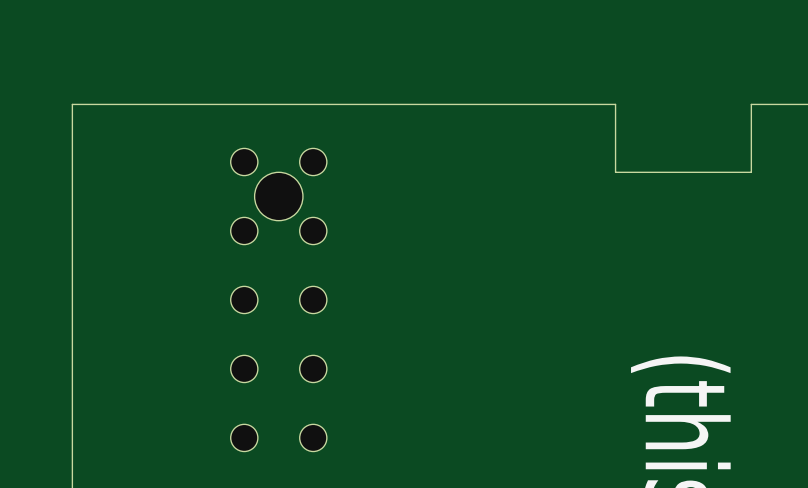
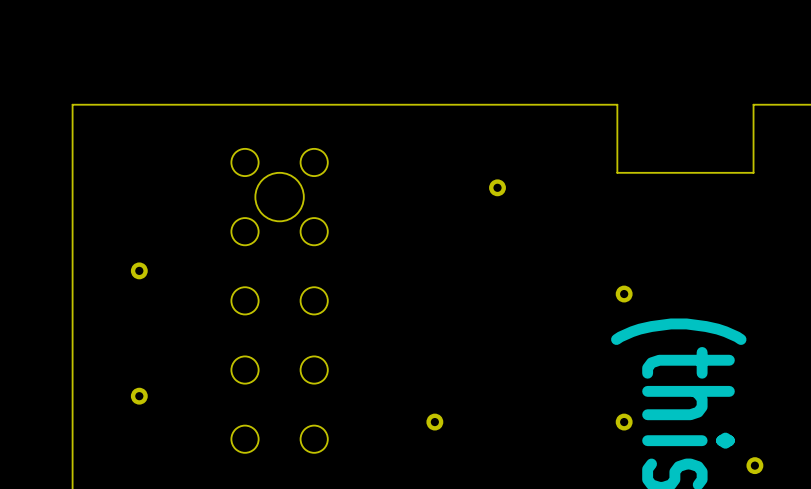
part: none -> (497, 187)
part: none -> (139, 270)
part: none -> (624, 294)
part: none -> (139, 396)
part: none -> (434, 422)
part: none -> (624, 422)
part: none -> (754, 465)

